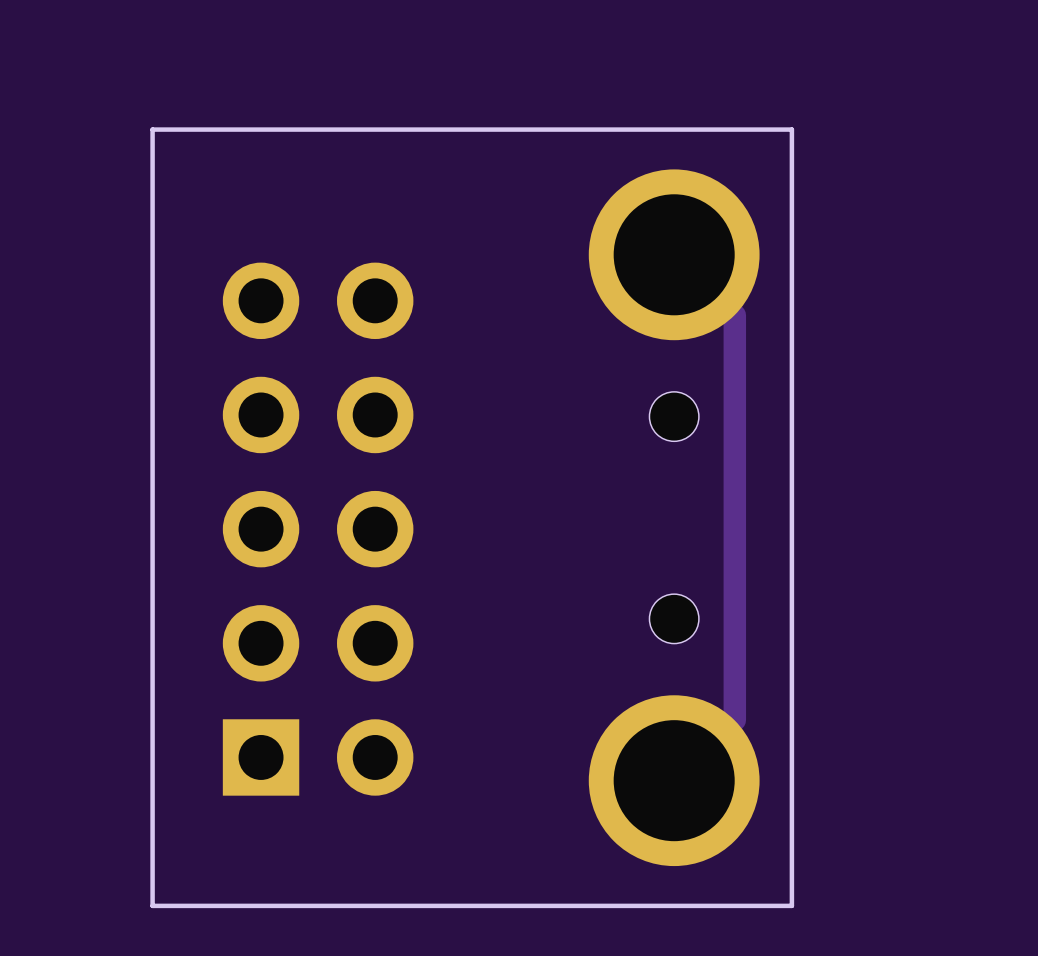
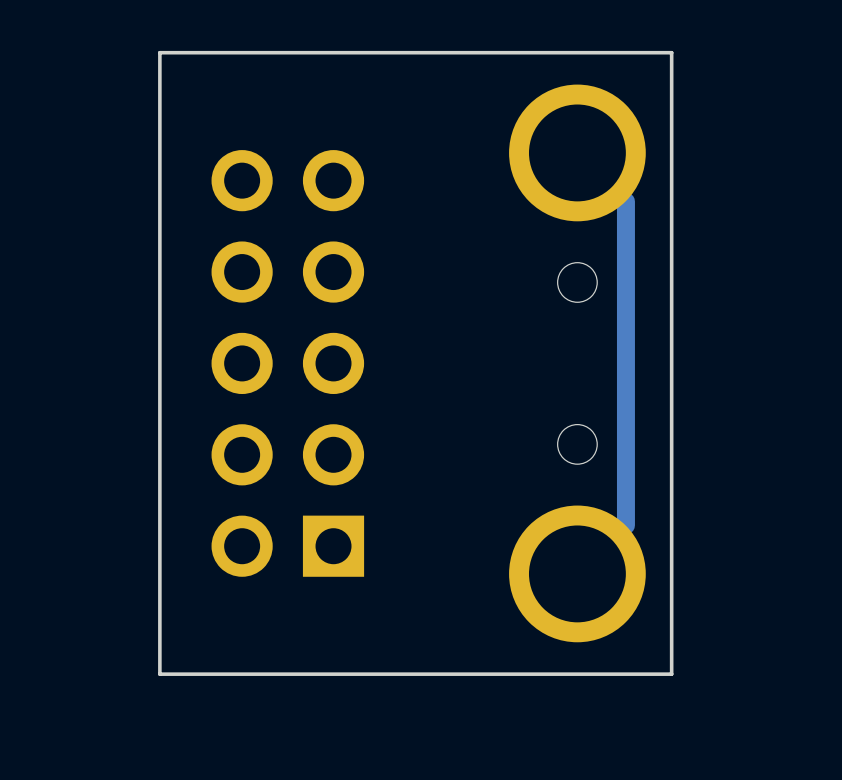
part footprint: [222, 262, 414, 796] -> [211, 150, 365, 577]

